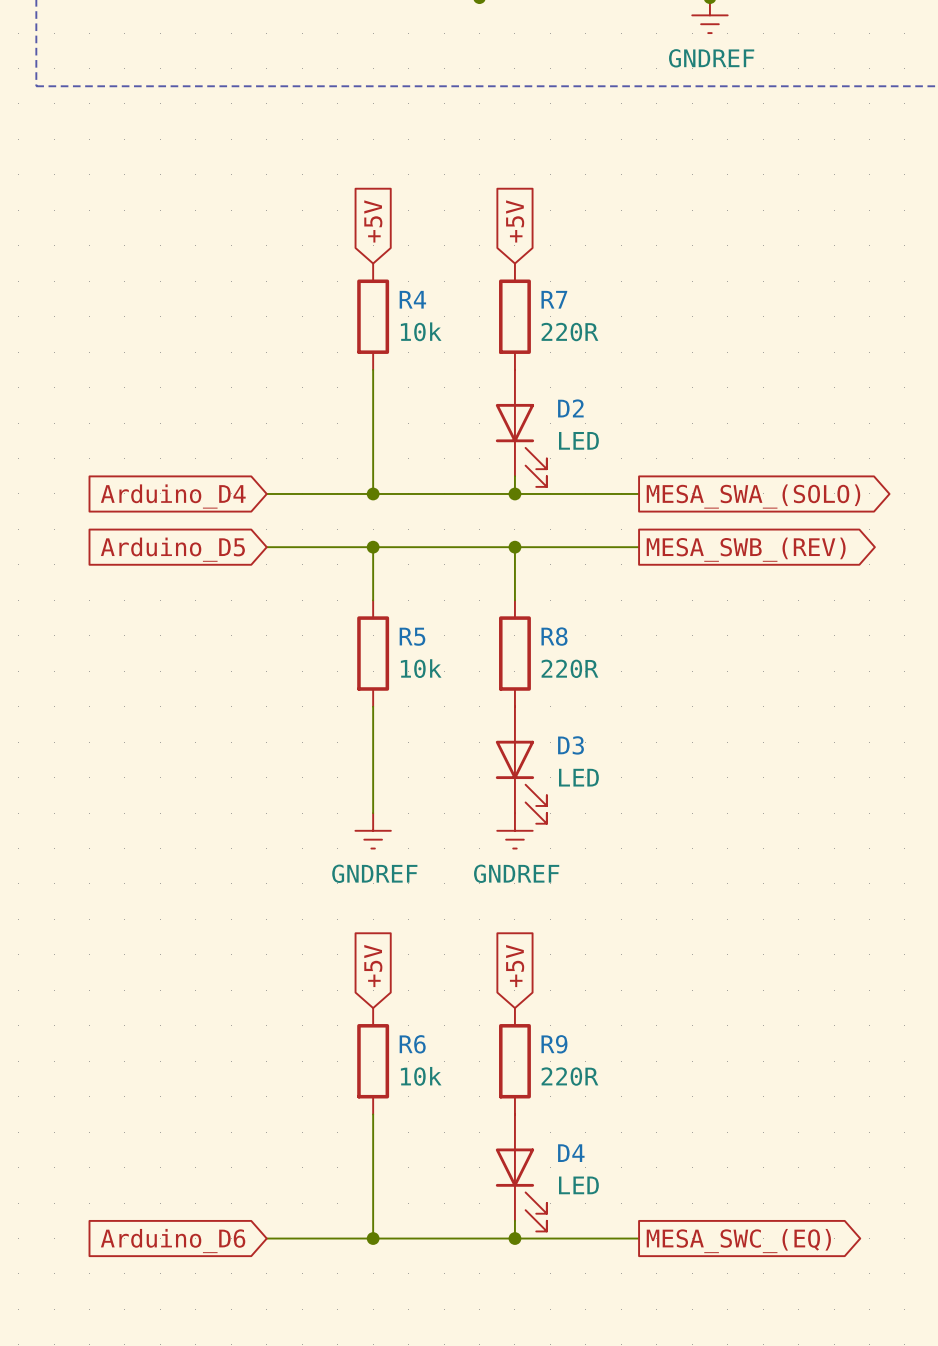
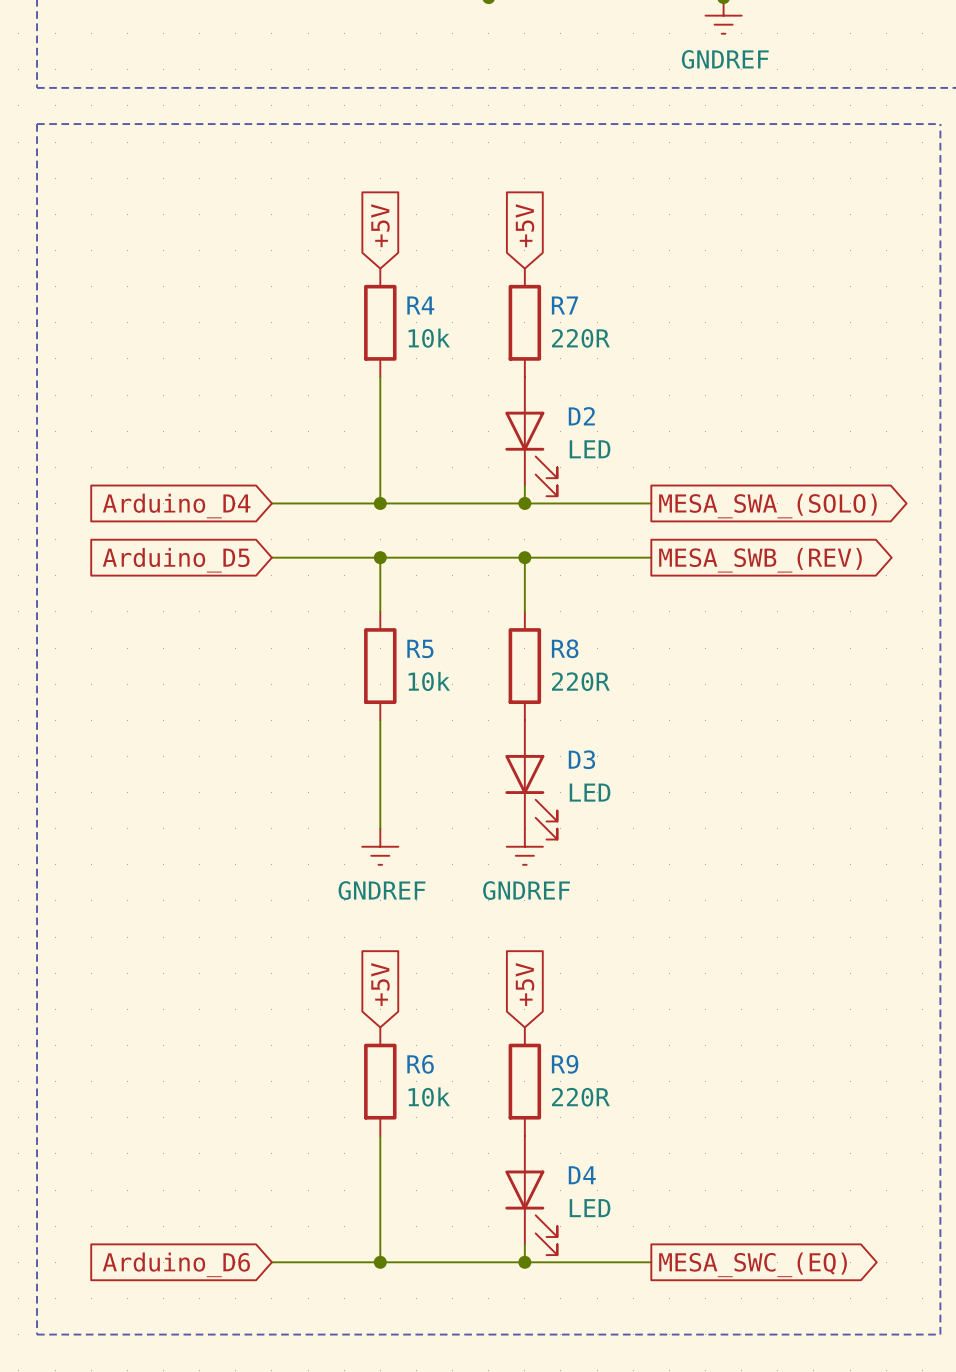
line: none -> (37, 124) (37, 1334) (940, 1334) (940, 124) (37, 124)

